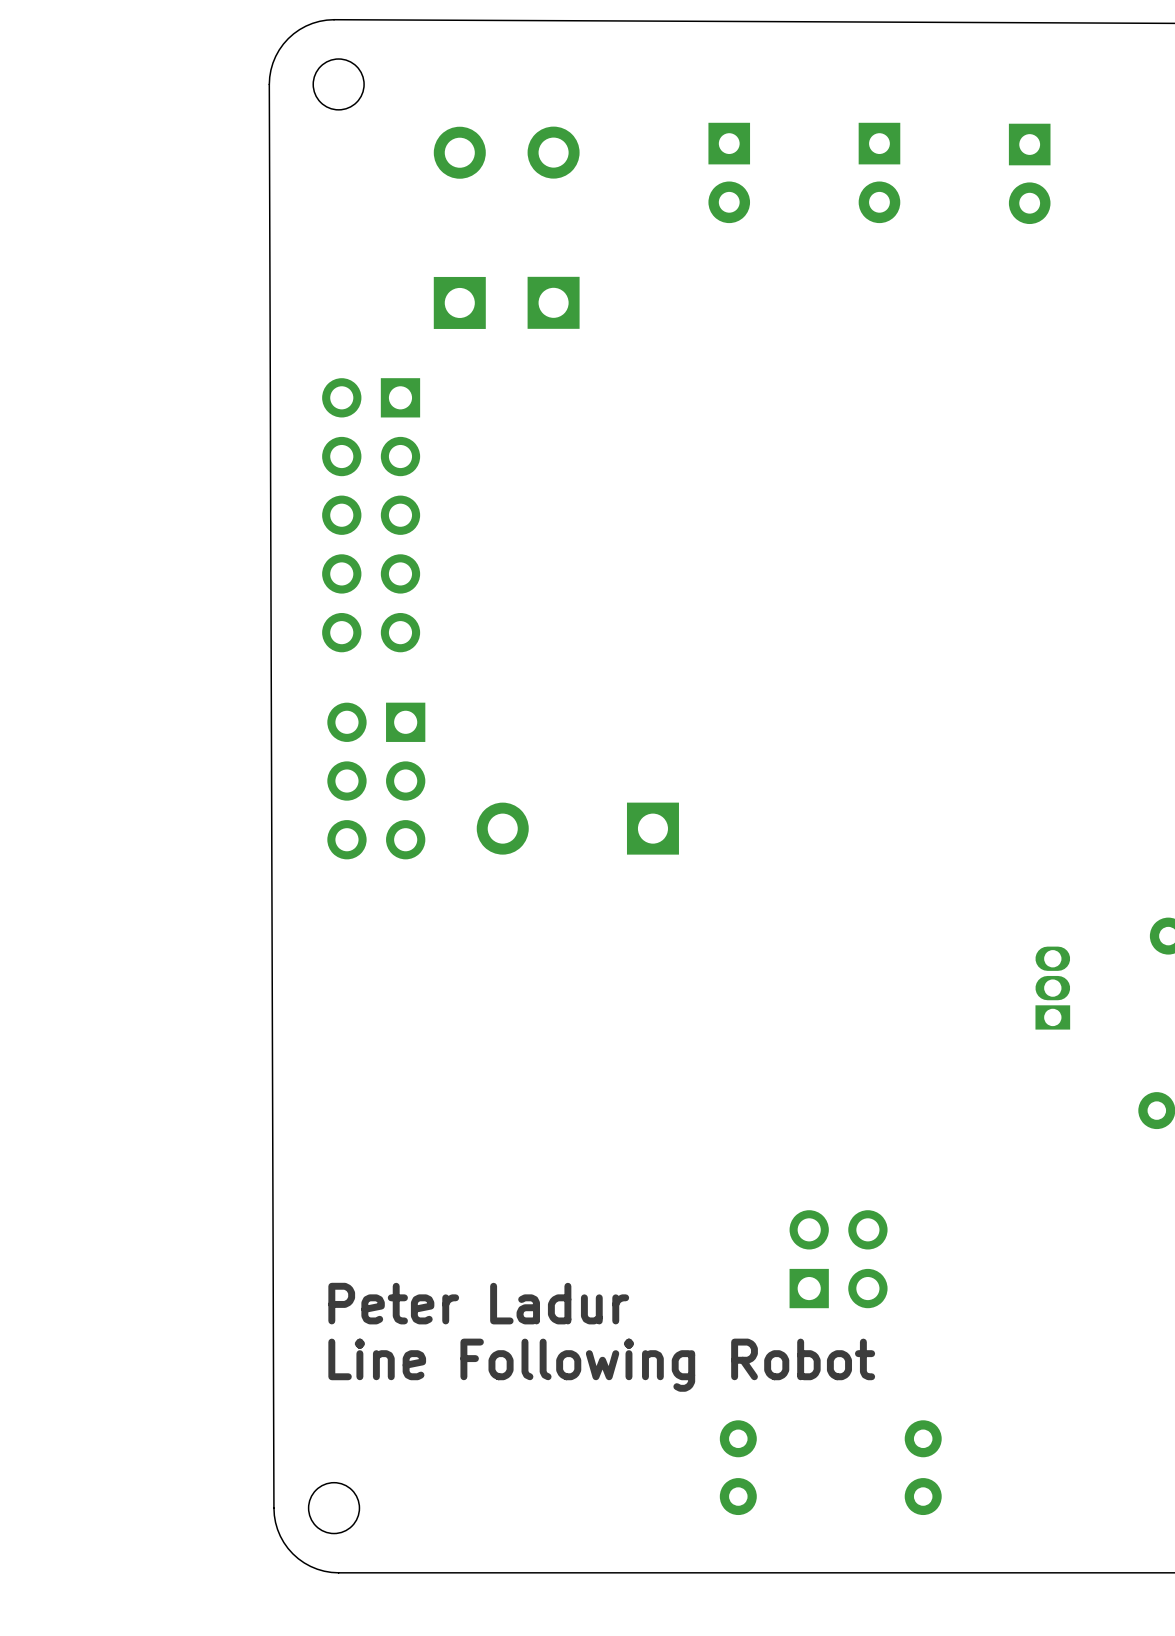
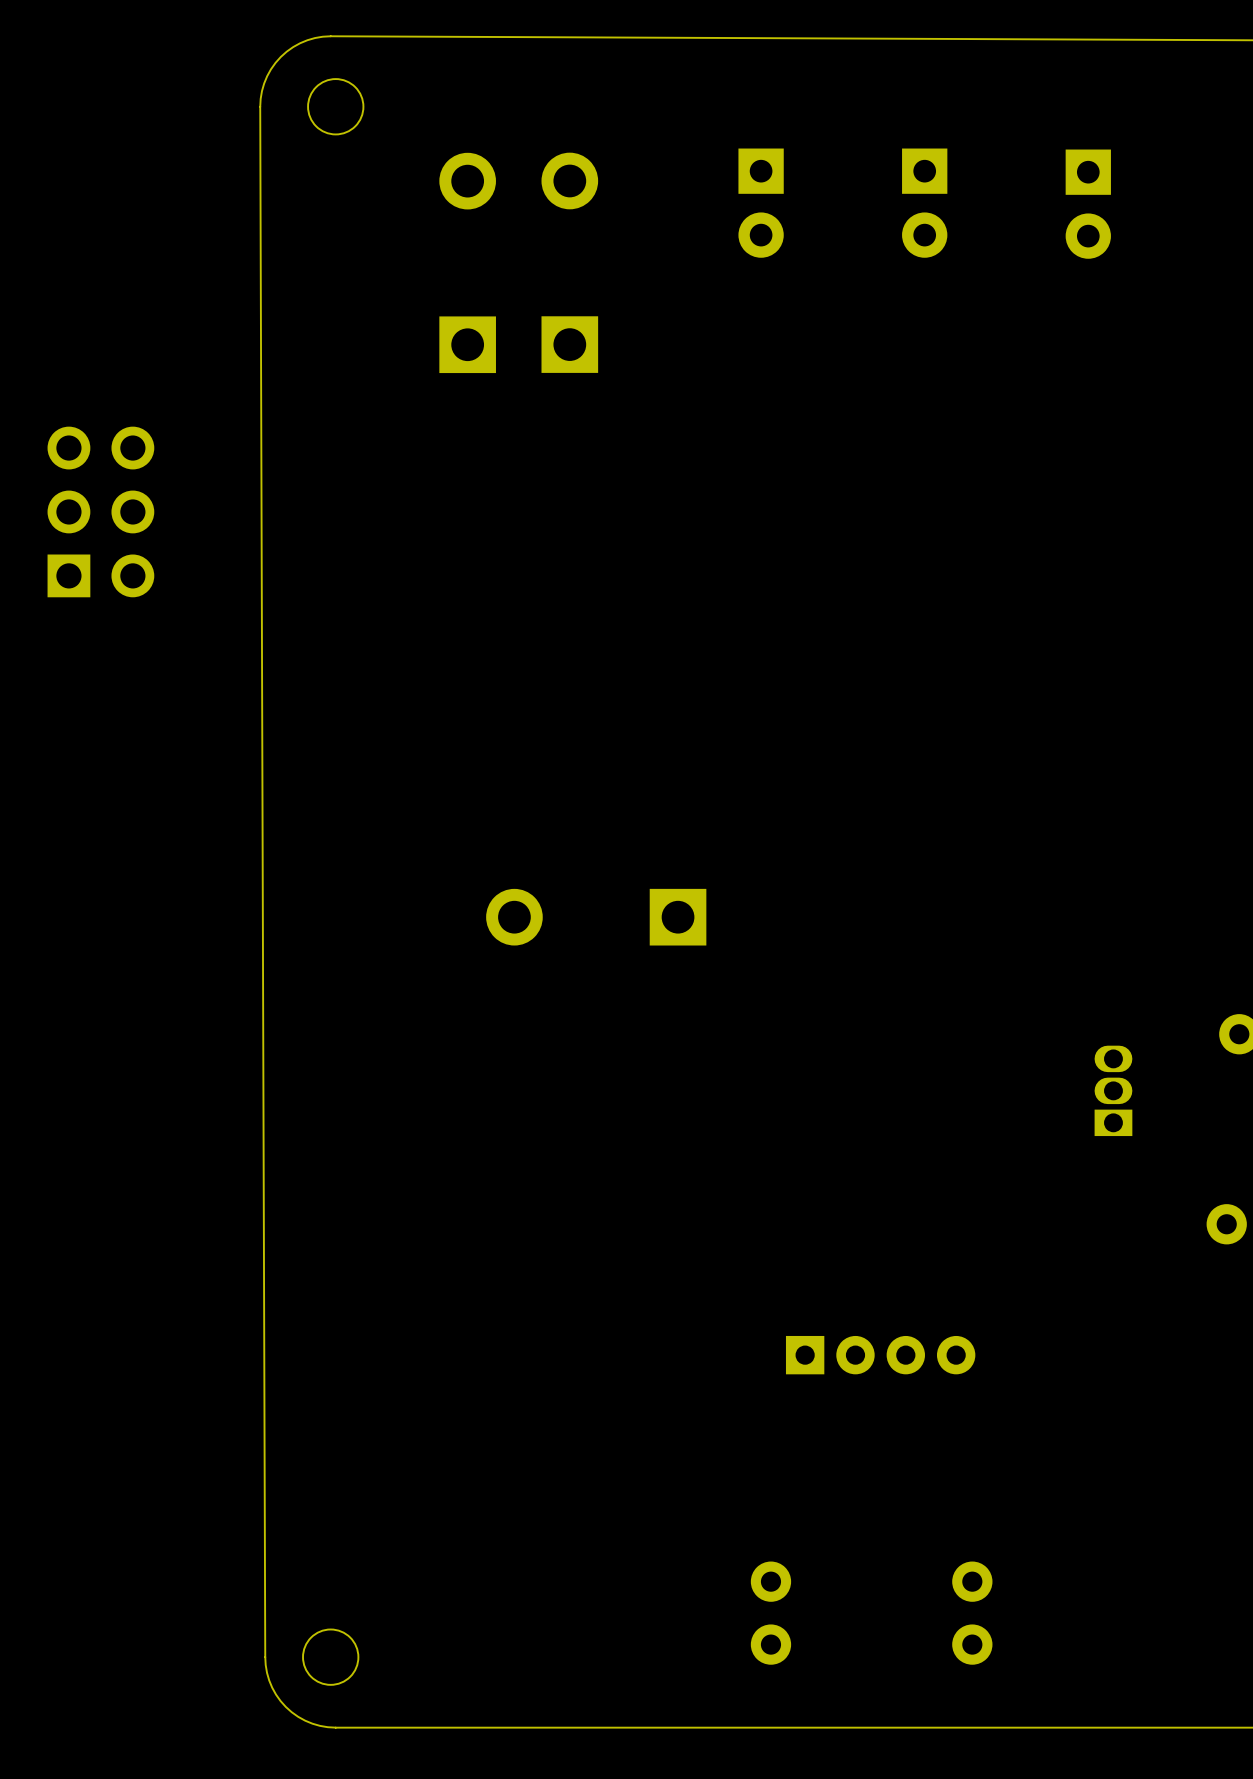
part: (371, 515) -> none
part rotation: 0° (376, 781) -> 180° (100, 511)
part position: (376, 781) -> (100, 511)
part: none -> (880, 1355)
part: (838, 1259) -> none
text: Peter Ladur (478, 1303) -> none
text: Line Following Robot (601, 1365) -> none

